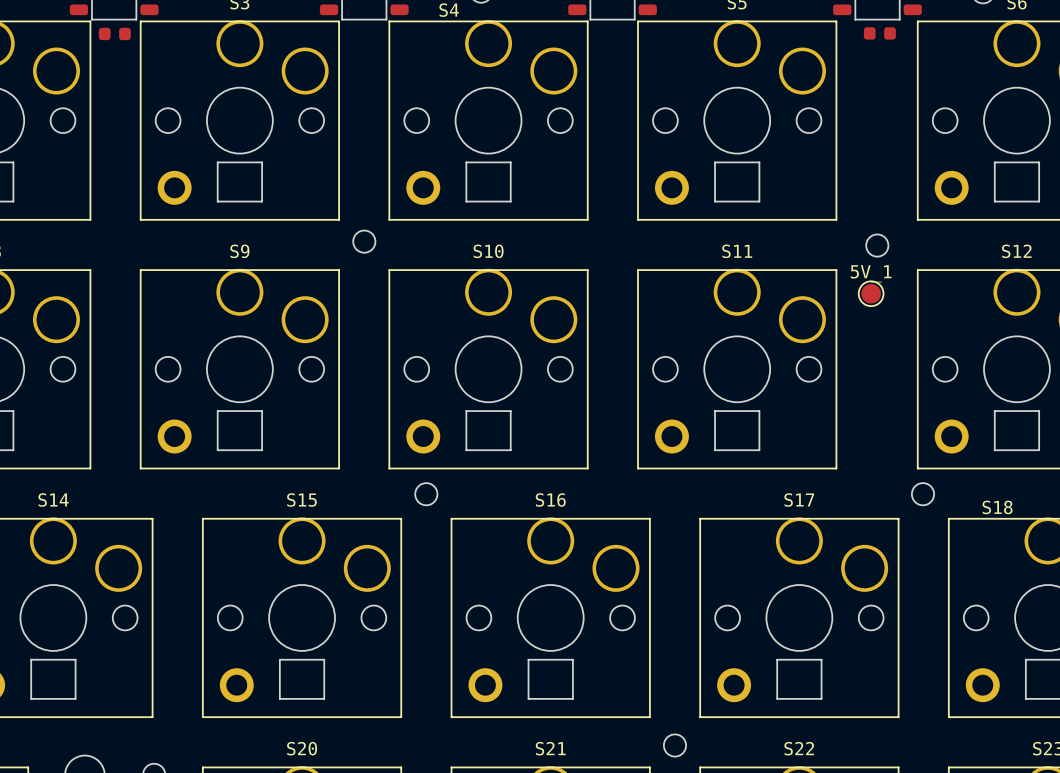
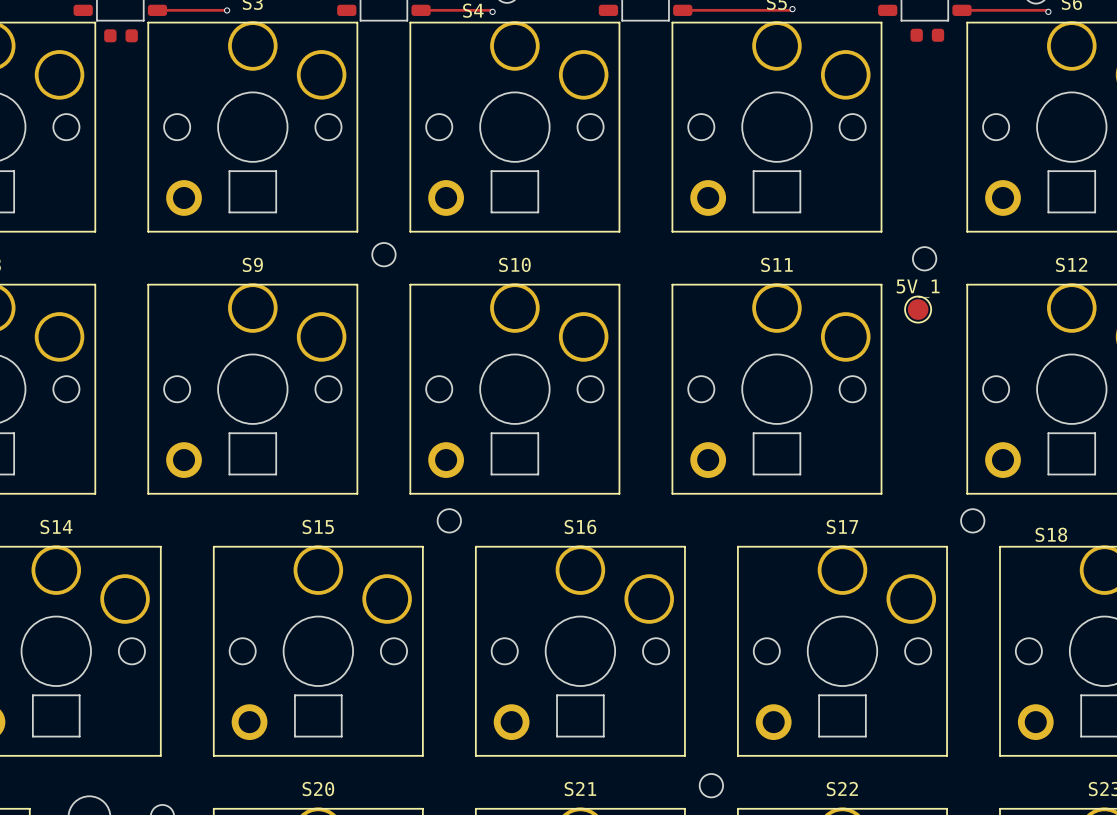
track: none -> (792, 9) (682, 10)
via: none -> (792, 9)
track: none -> (157, 10) (226, 10)
via: none -> (227, 10)
track: none -> (421, 10) (492, 11)
track: none -> (962, 10) (1048, 11)
via: none -> (492, 11)
via: none -> (1048, 11)

